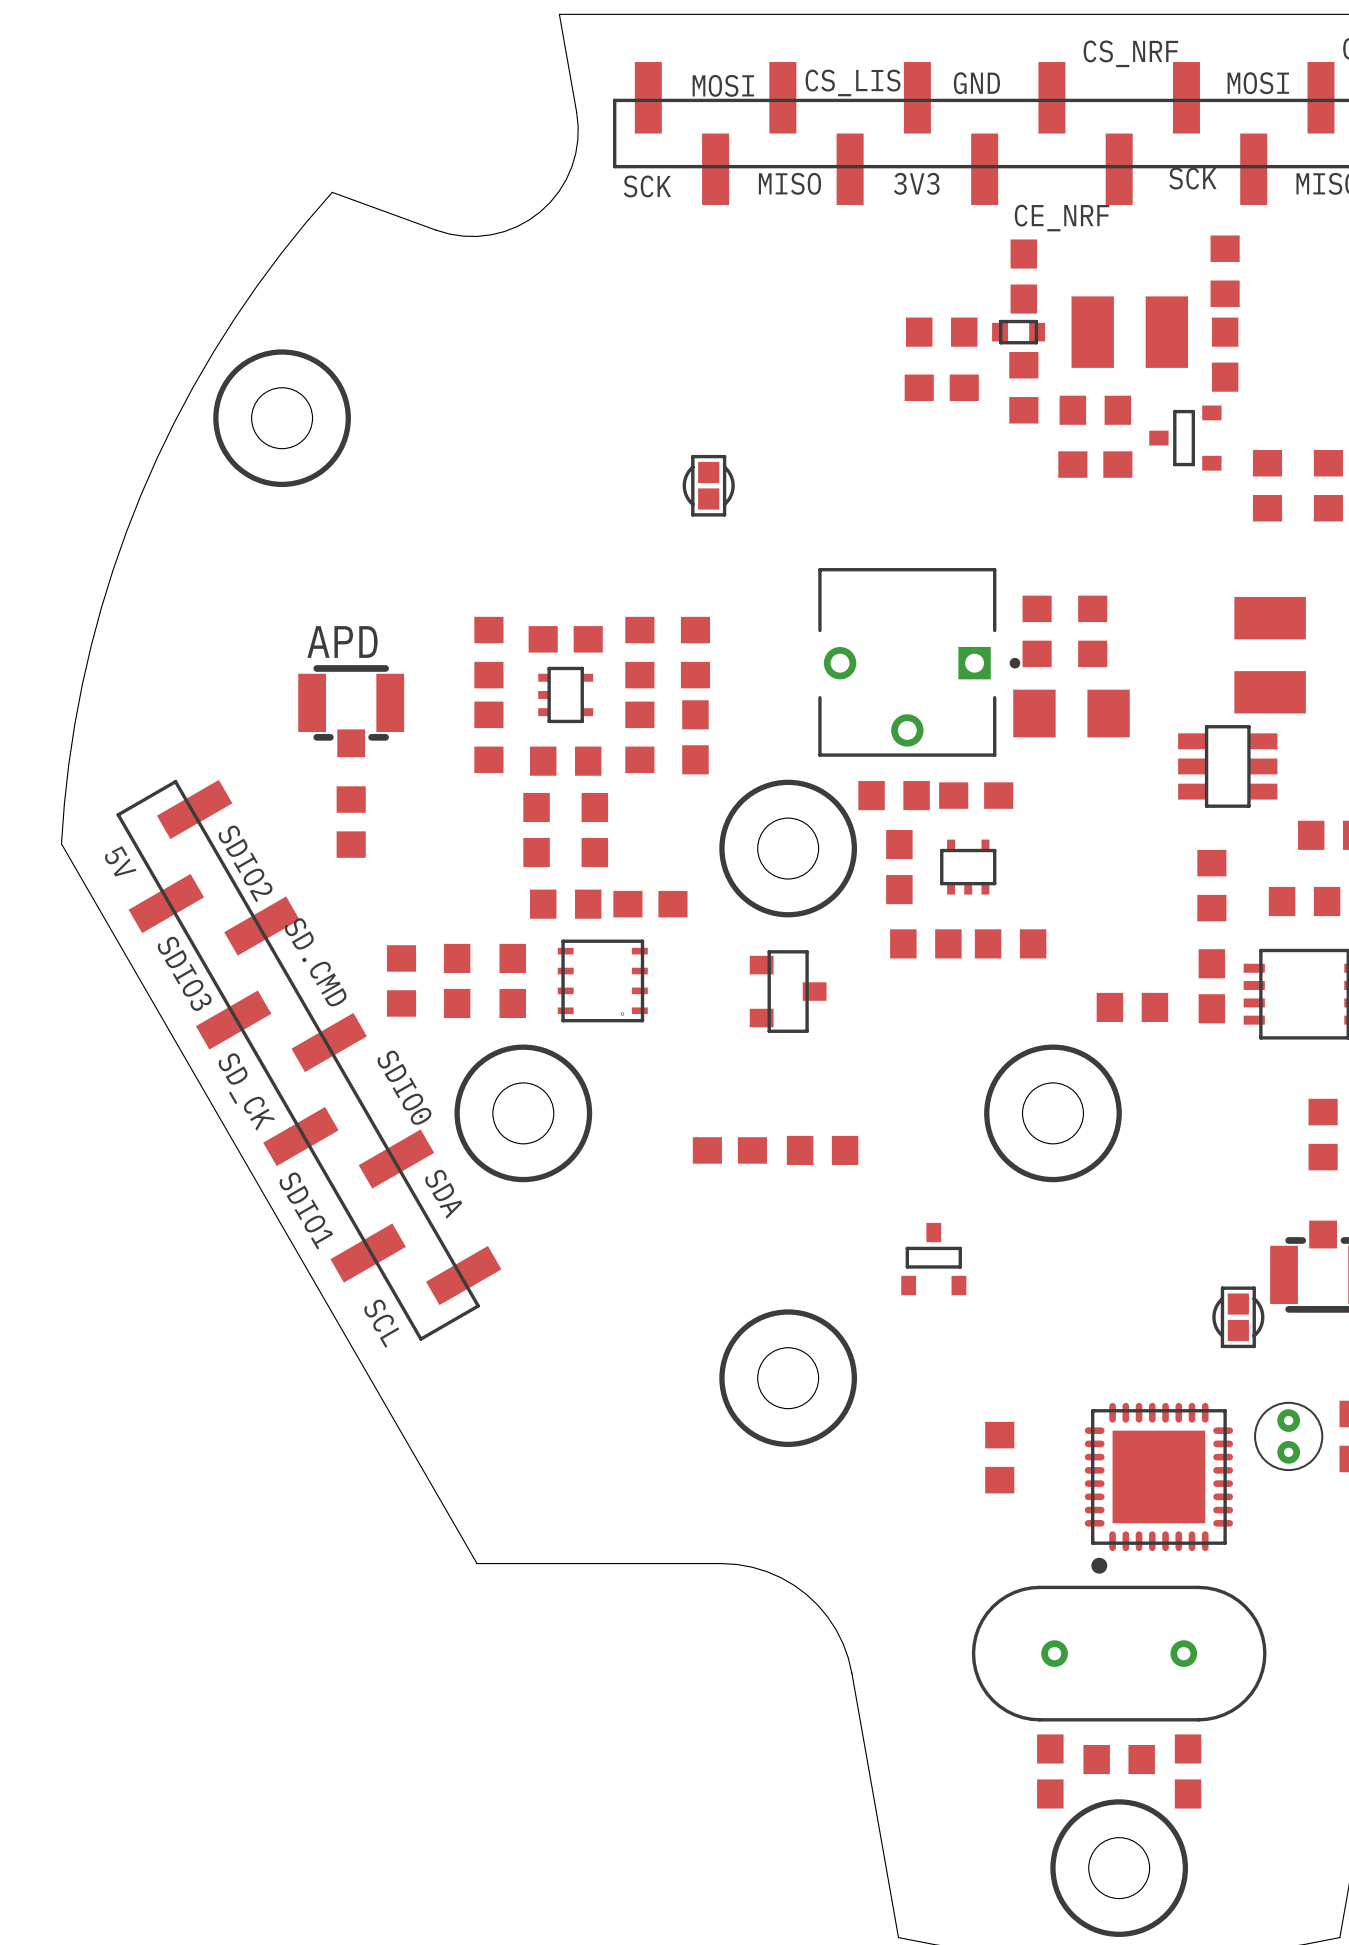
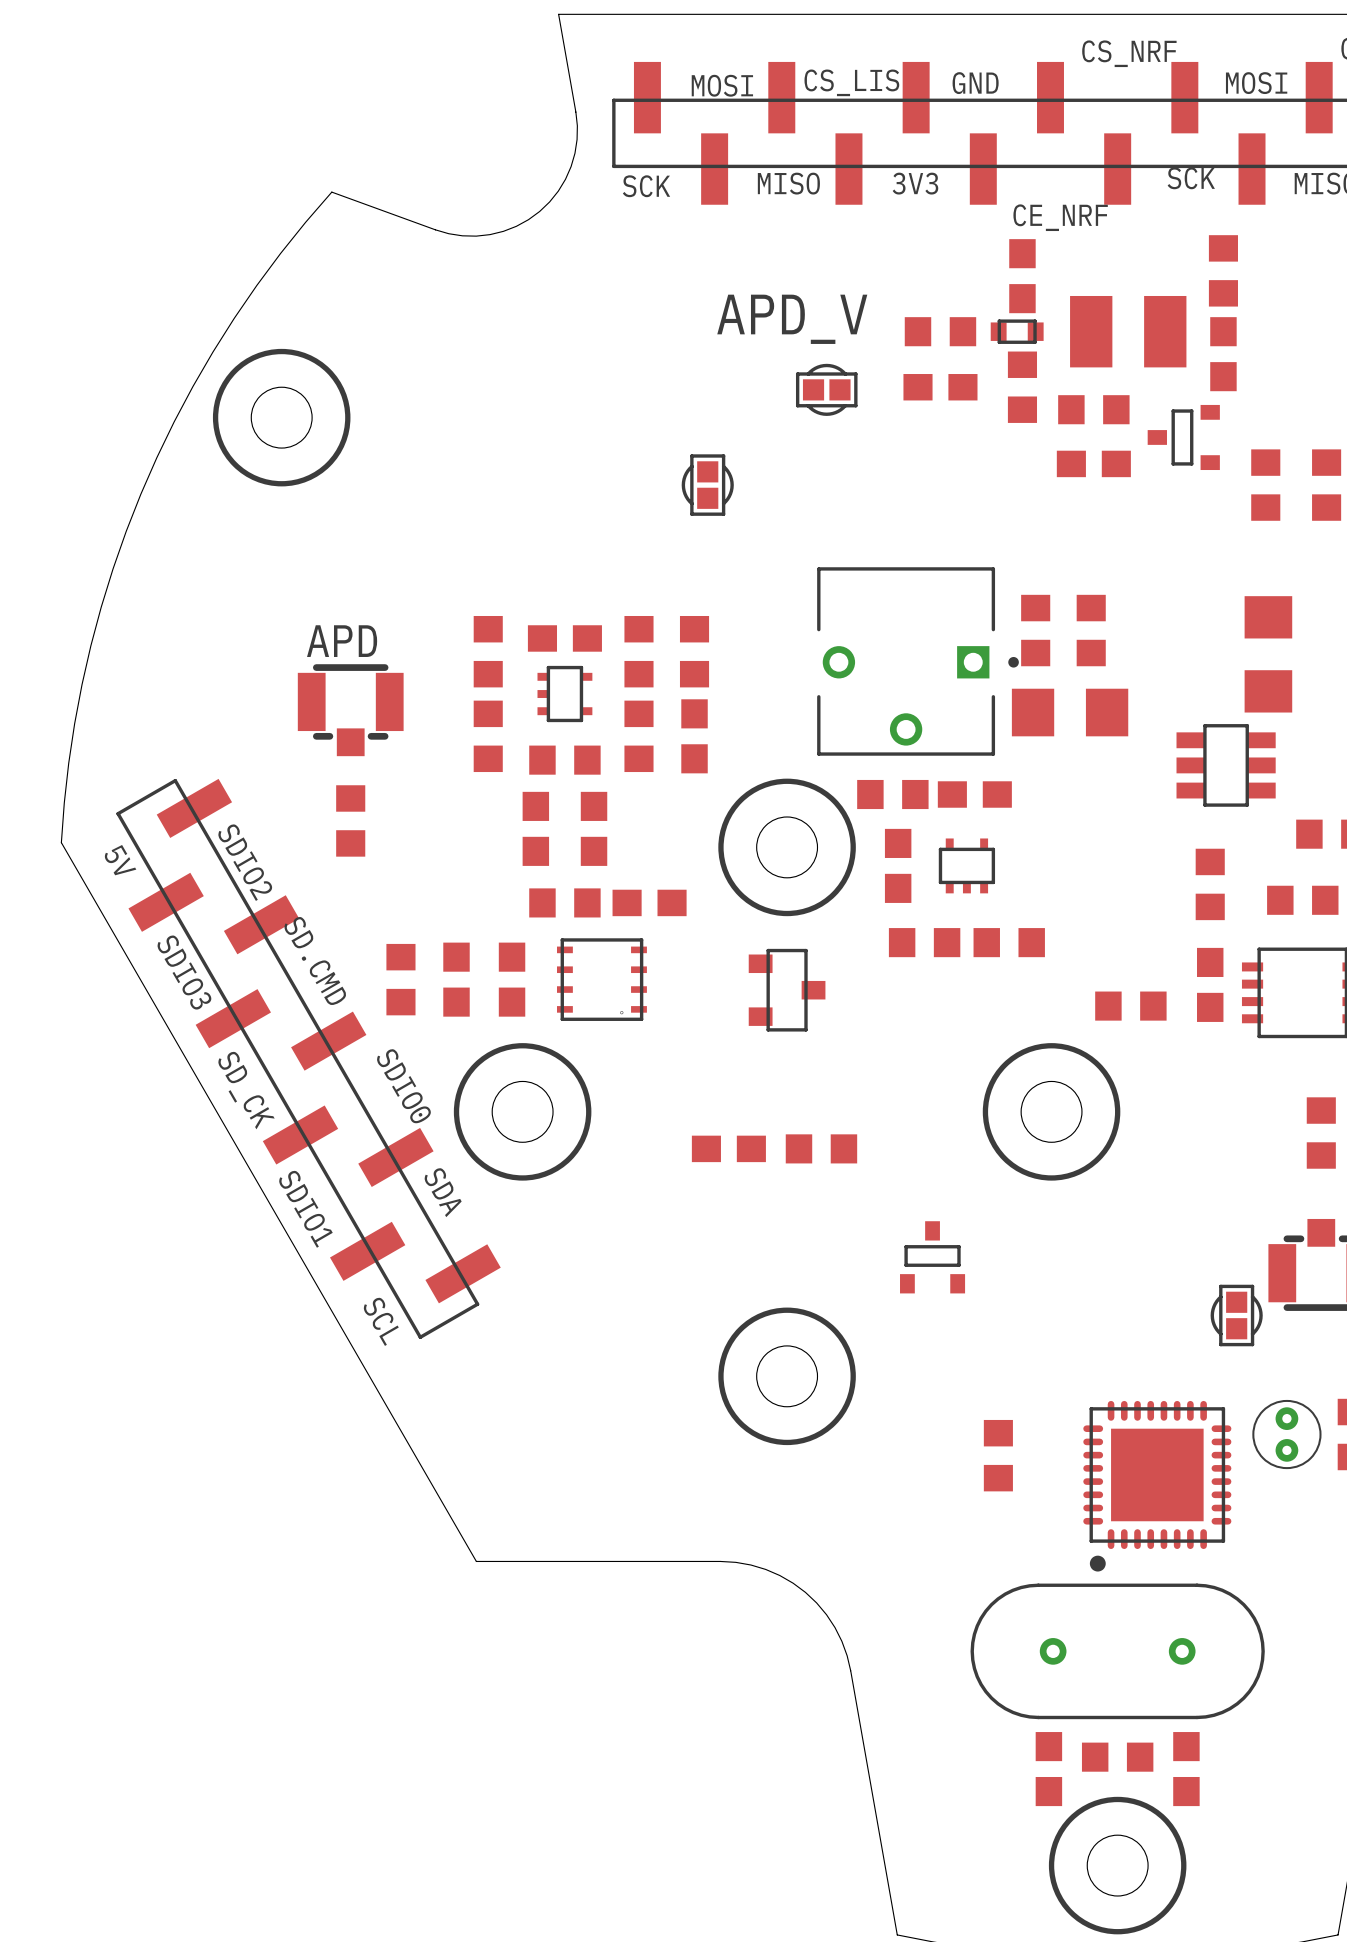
text: none -> APD_V (792, 319)
part: none -> (826, 389)
part footprint: [1234, 596, 1306, 714] -> [1244, 596, 1293, 713]

